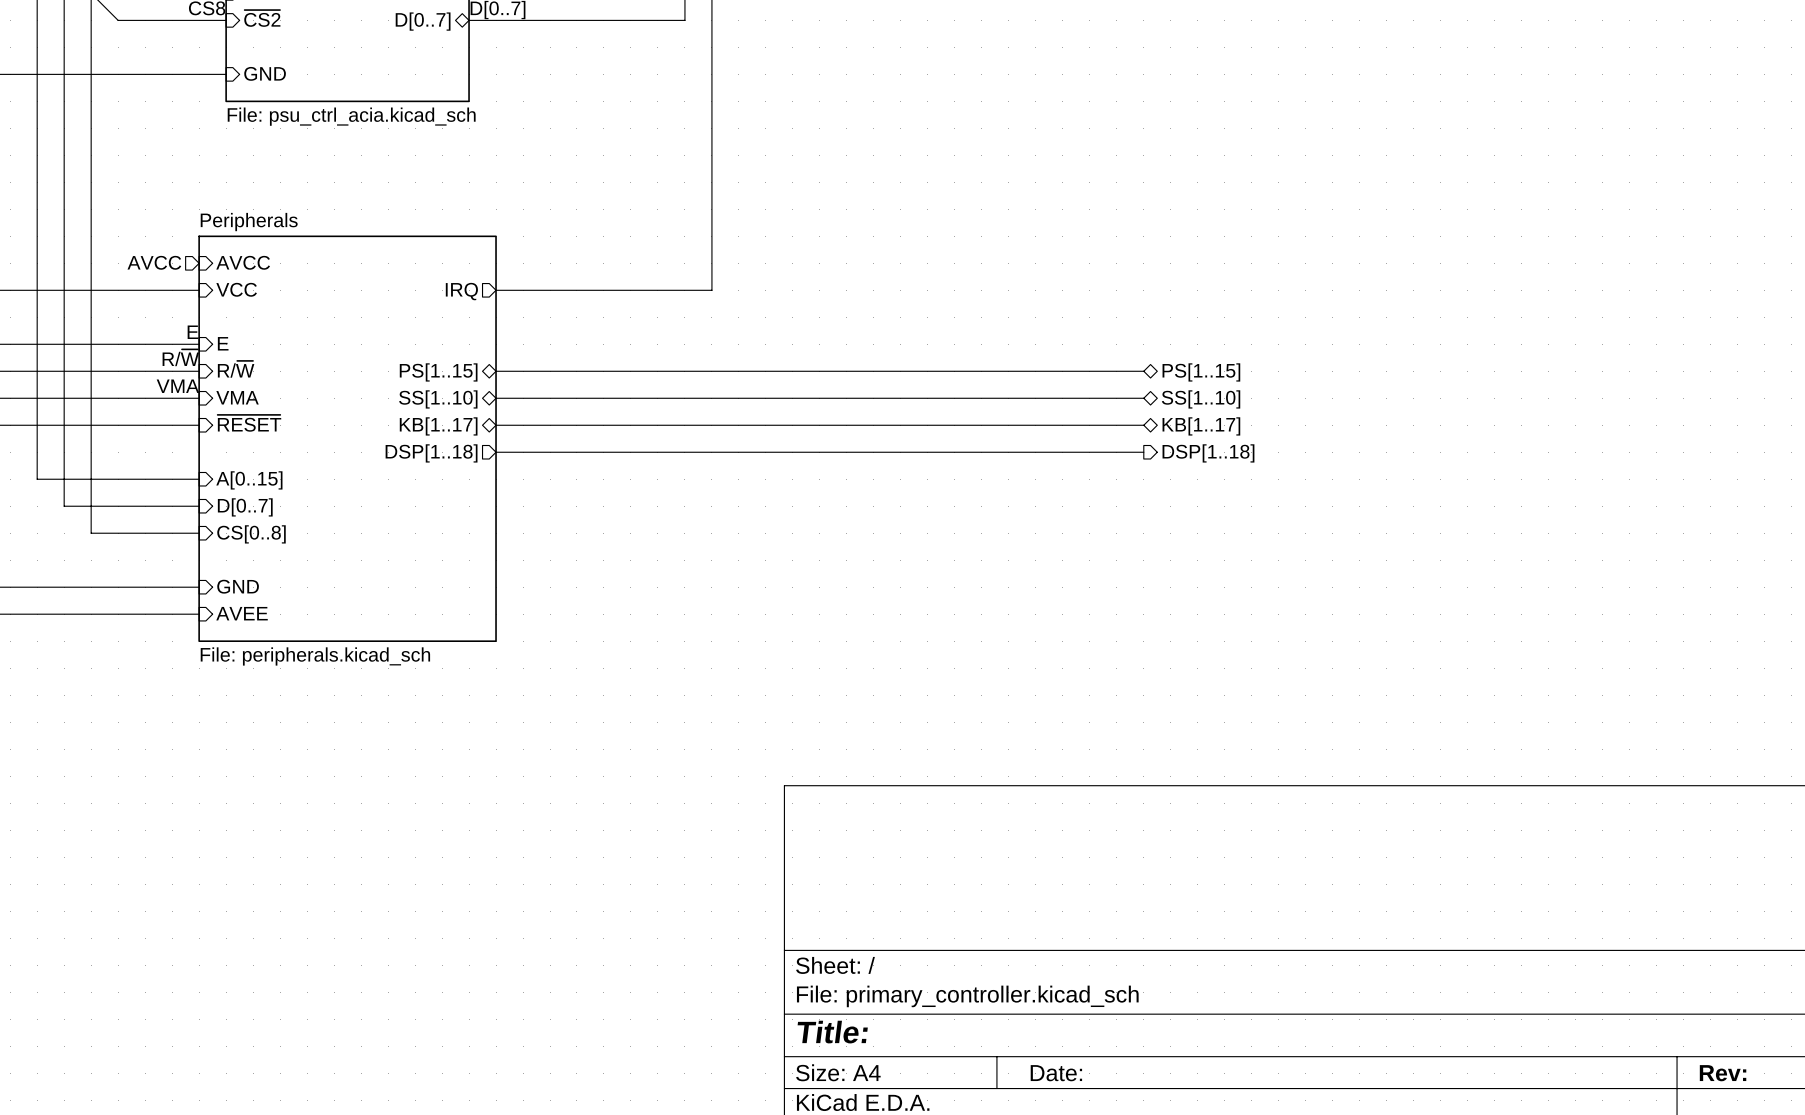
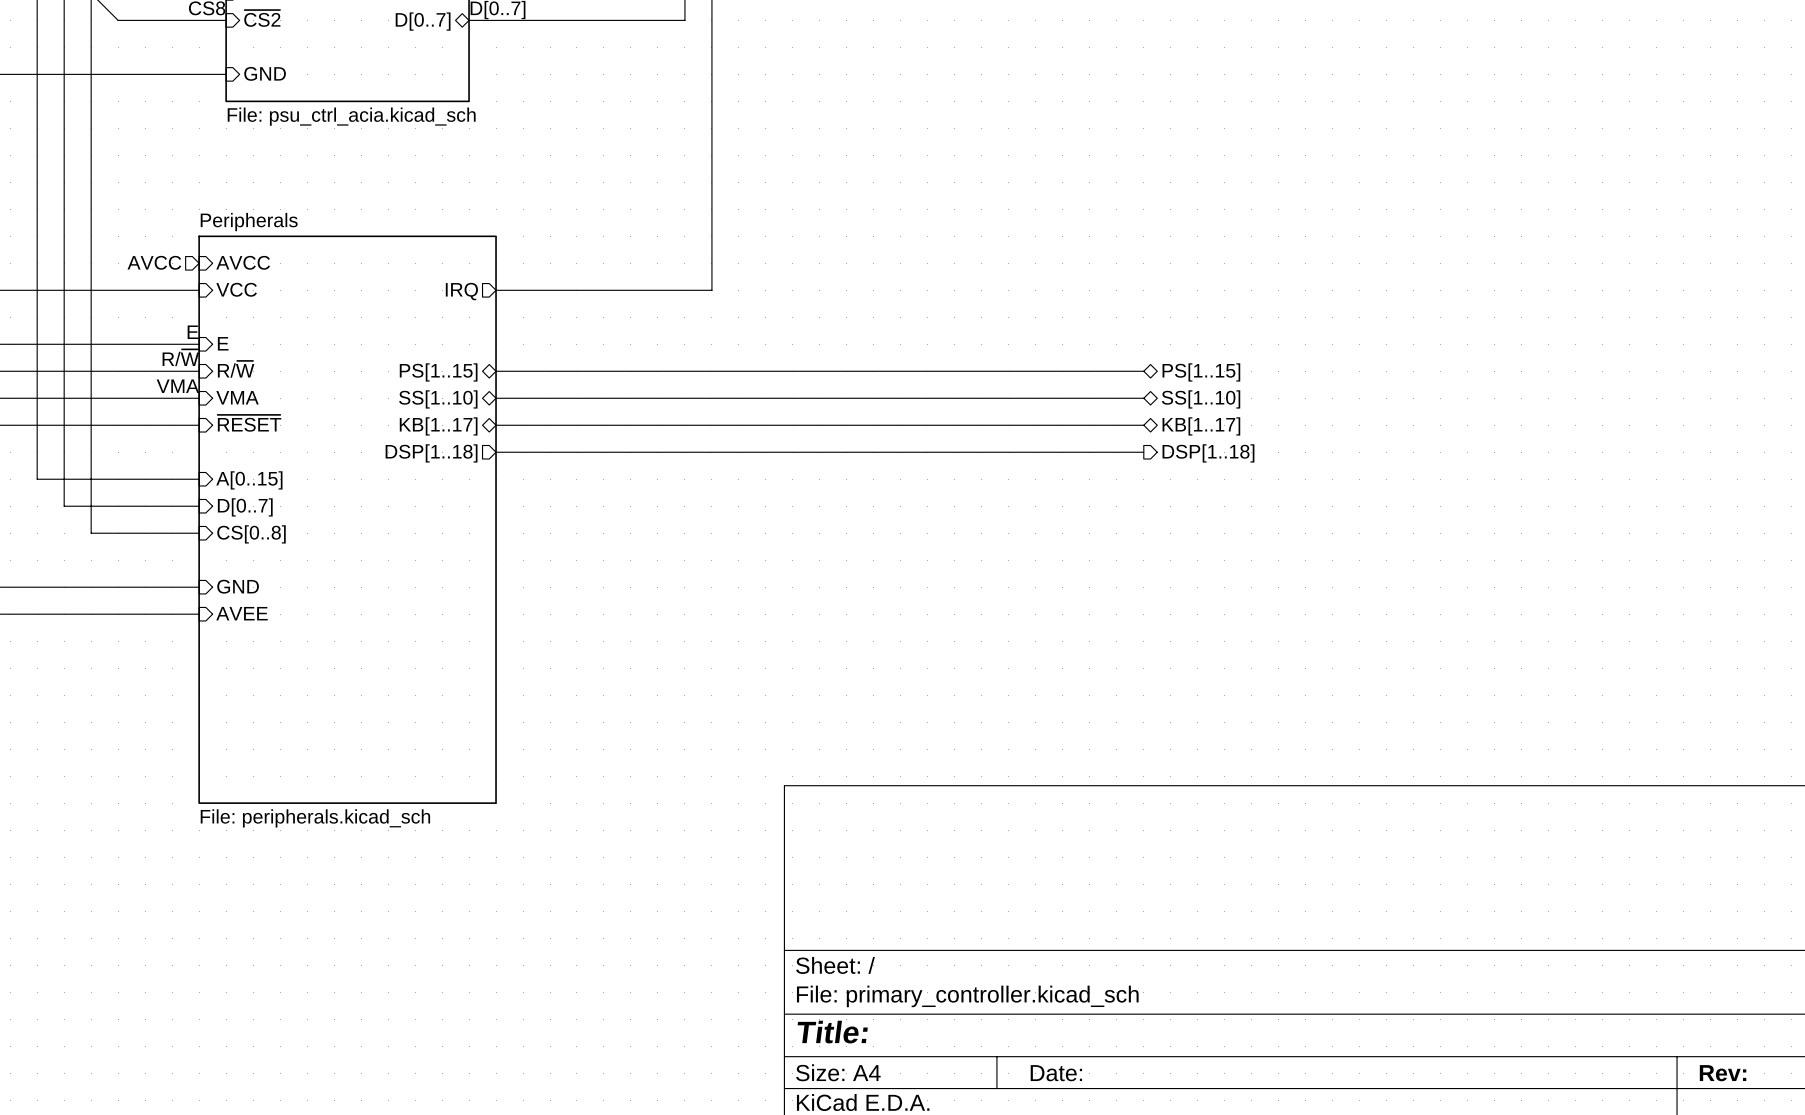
sheet Peripherals: File: peripherals.kicad_sch (347, 438) -> none
sheet Peripherals: none -> File: peripherals.kicad_sch (347, 519)

